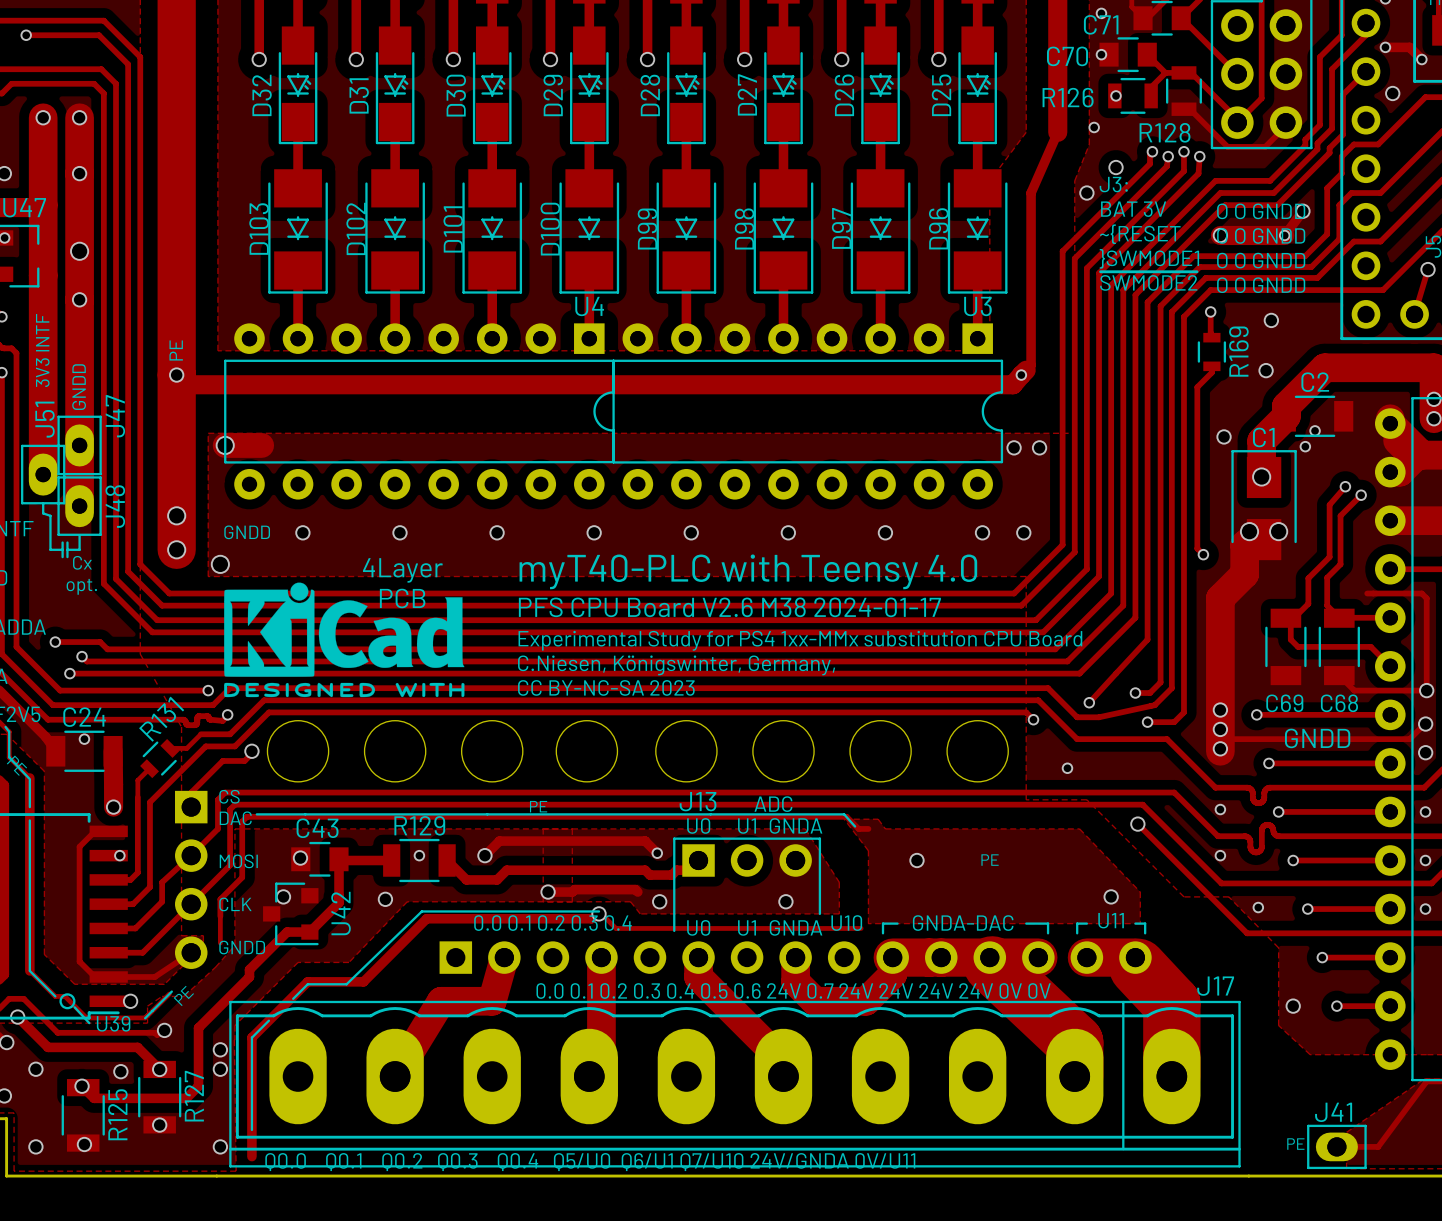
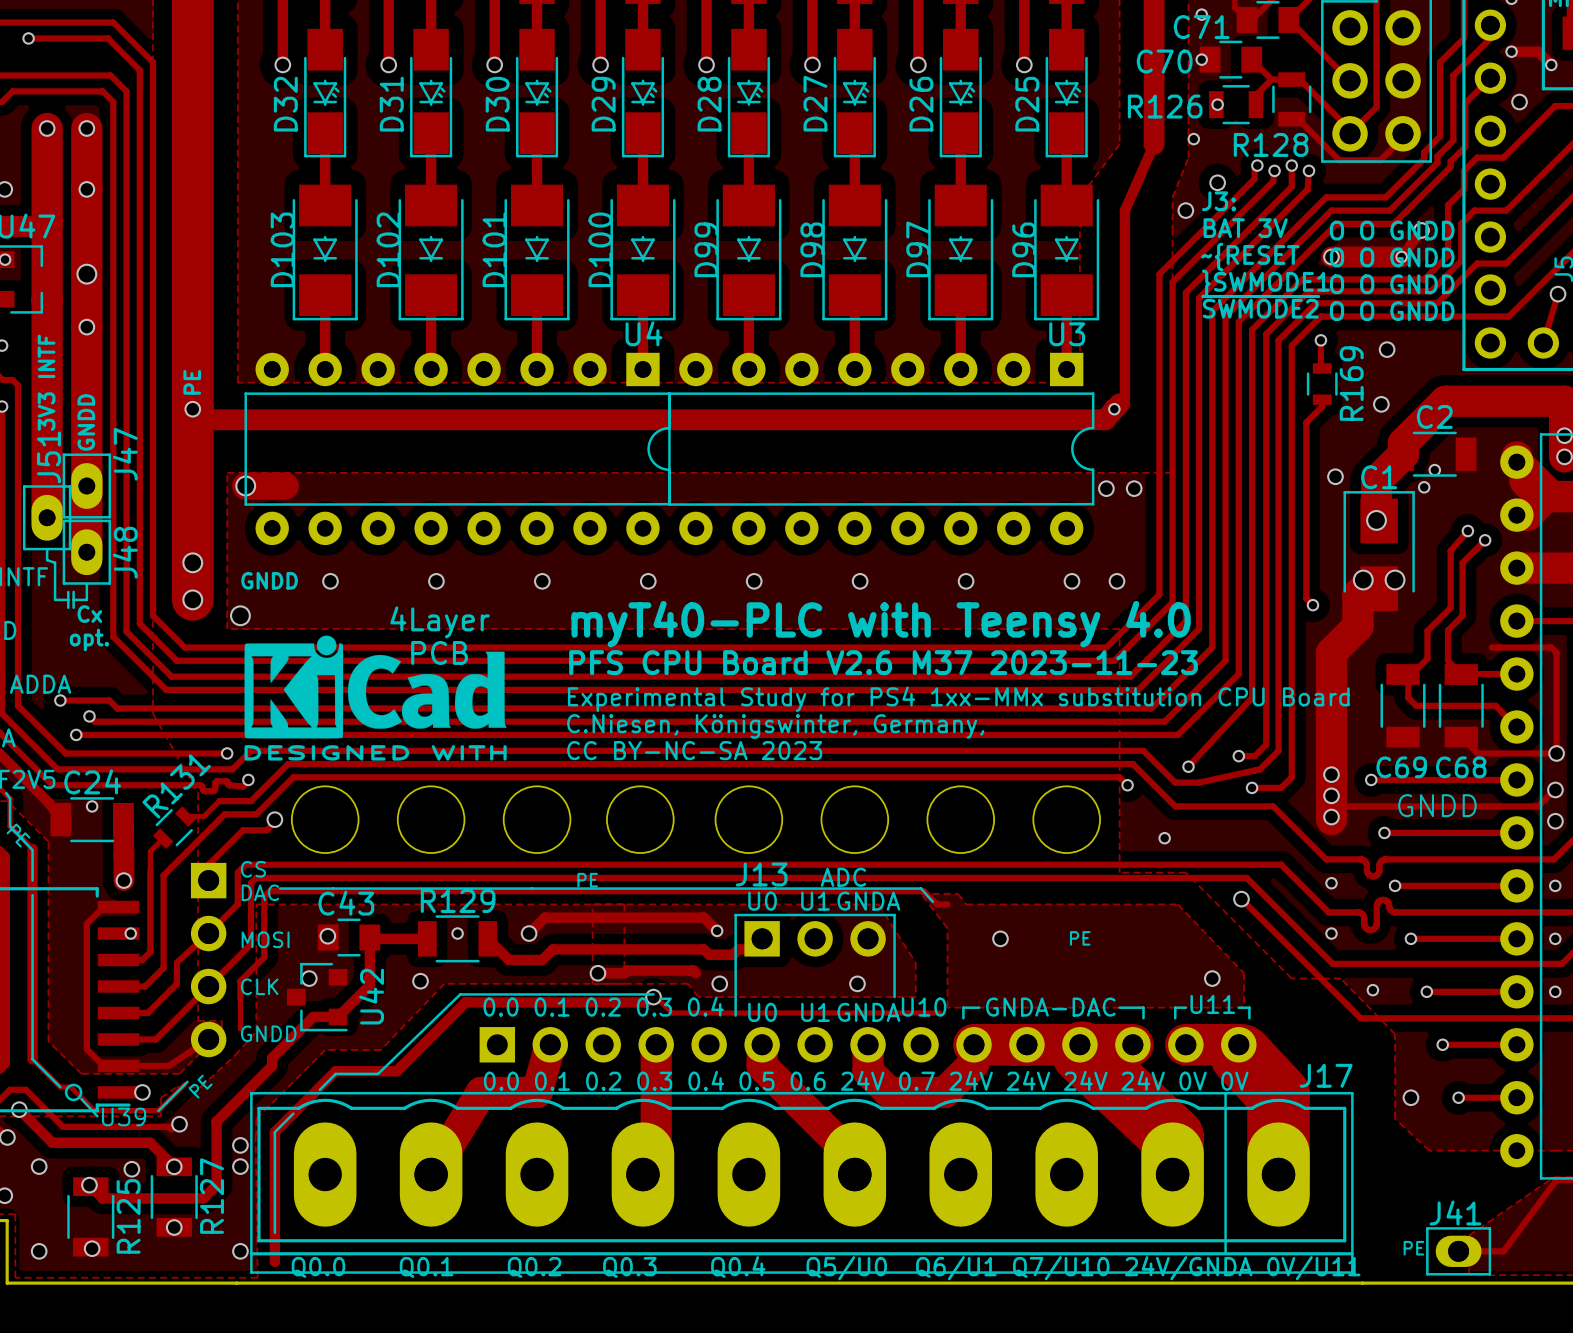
text: PFS CPU Board V2.6 M38 2024-01-17 (729, 607) -> PFS CPU Board V2.6 M37 2023-11-23 (883, 662)

